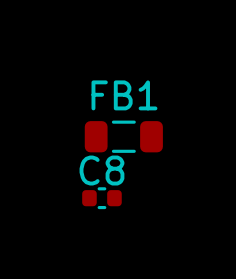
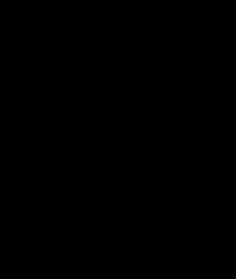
FB1: (123, 136) -> none
C8: (101, 198) -> none

